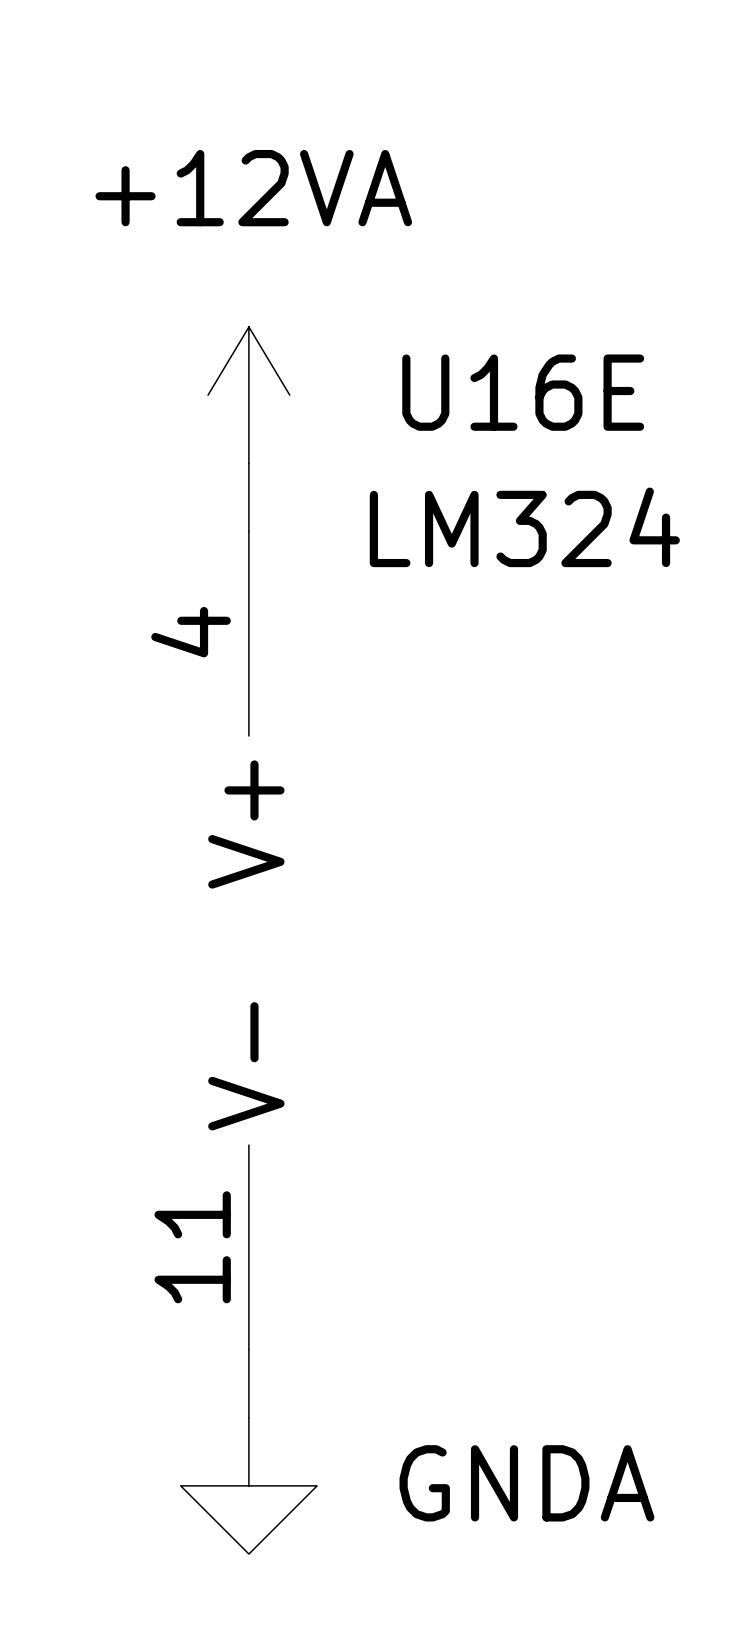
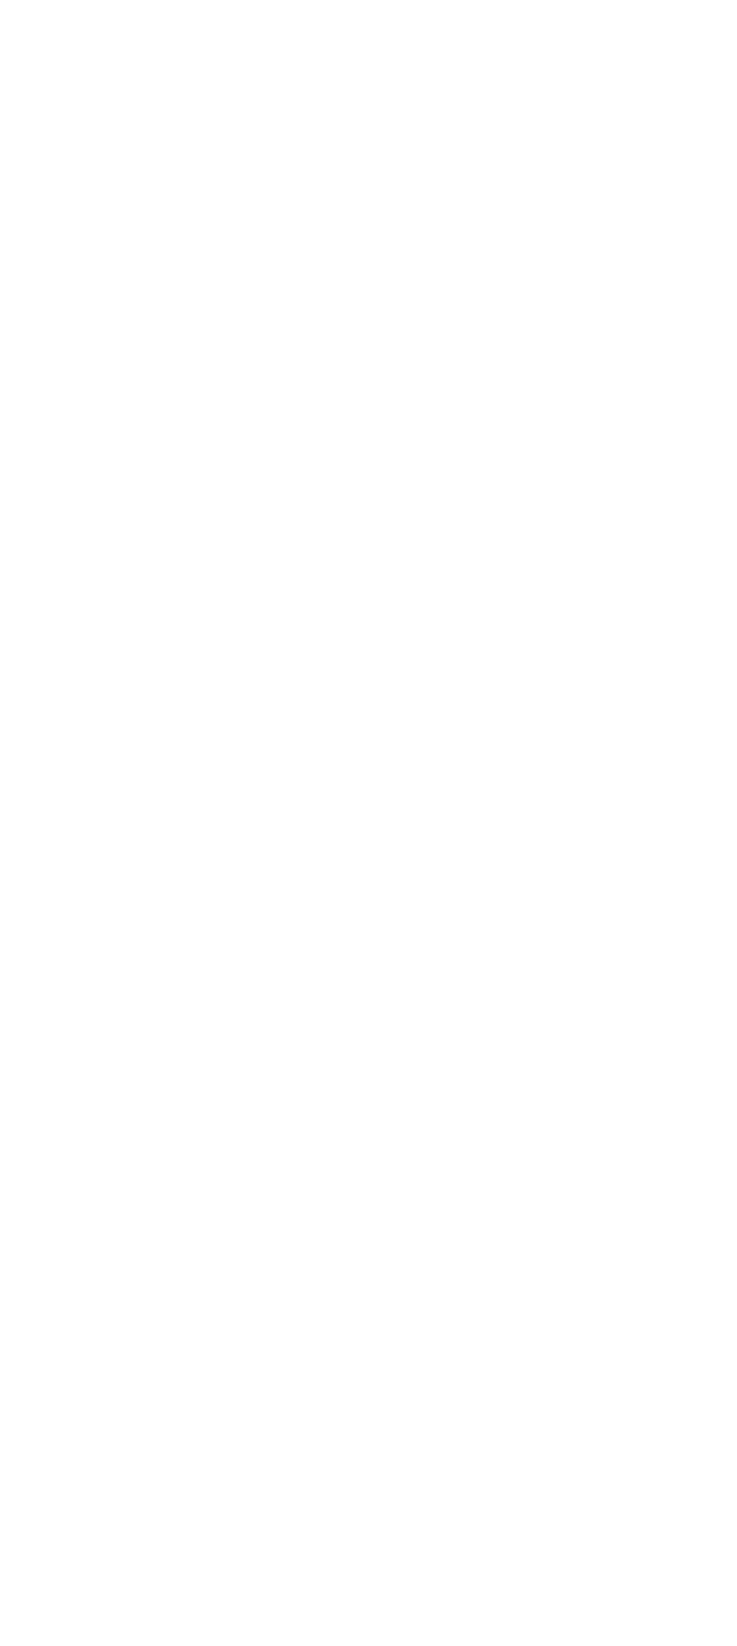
power symbol: +12VA (248, 395) -> none
wire: (248, 463) (248, 531) -> none
U16E: LM324 (248, 940) -> none
wire: (248, 1349) (248, 1417) -> none
power symbol: GNDA (248, 1485) -> none

